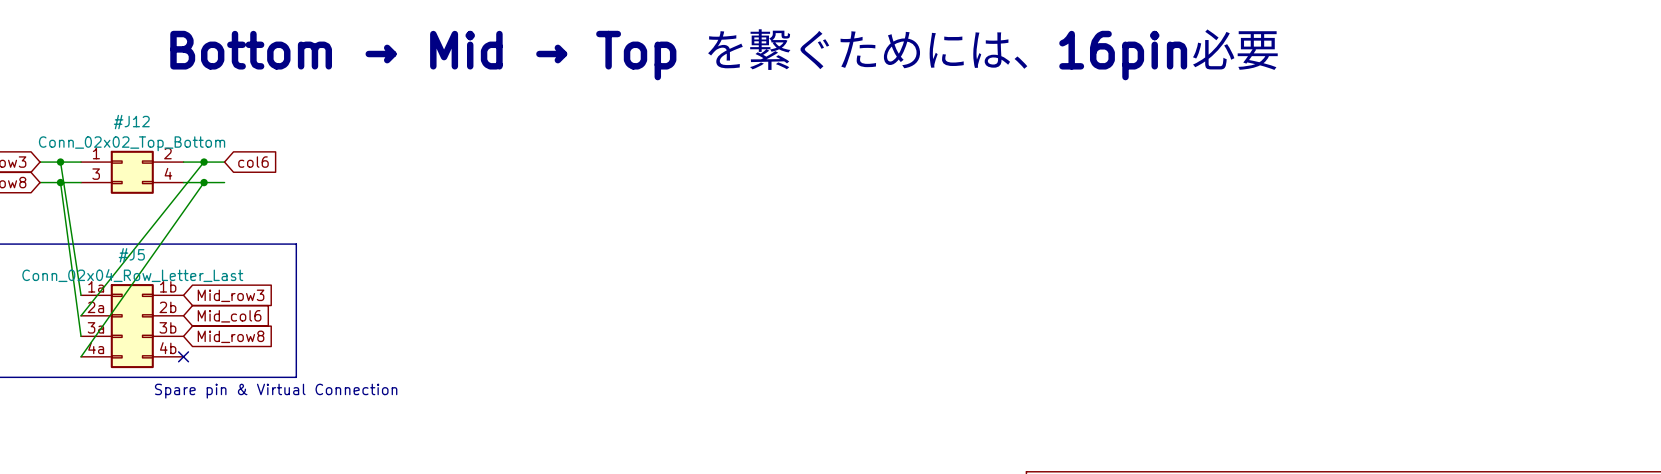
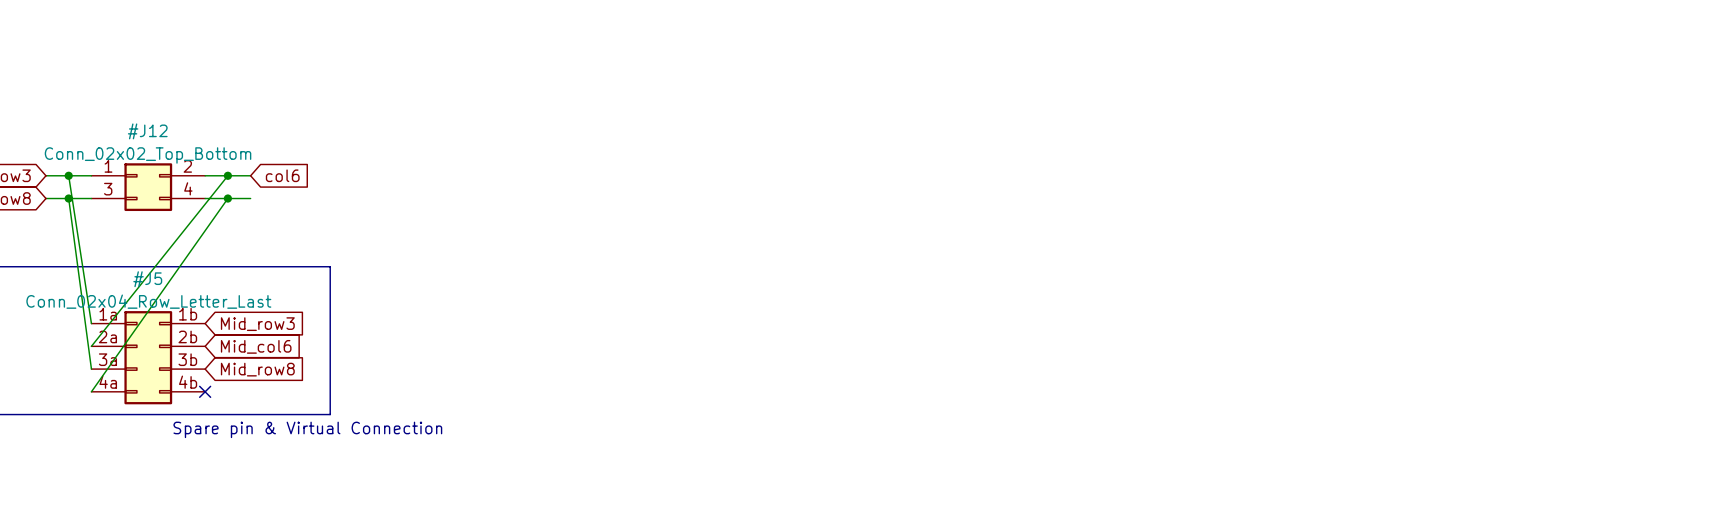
text: Bottom → Mid → Top を繋ぐためには、16pin必要 (725, 53) -> none

